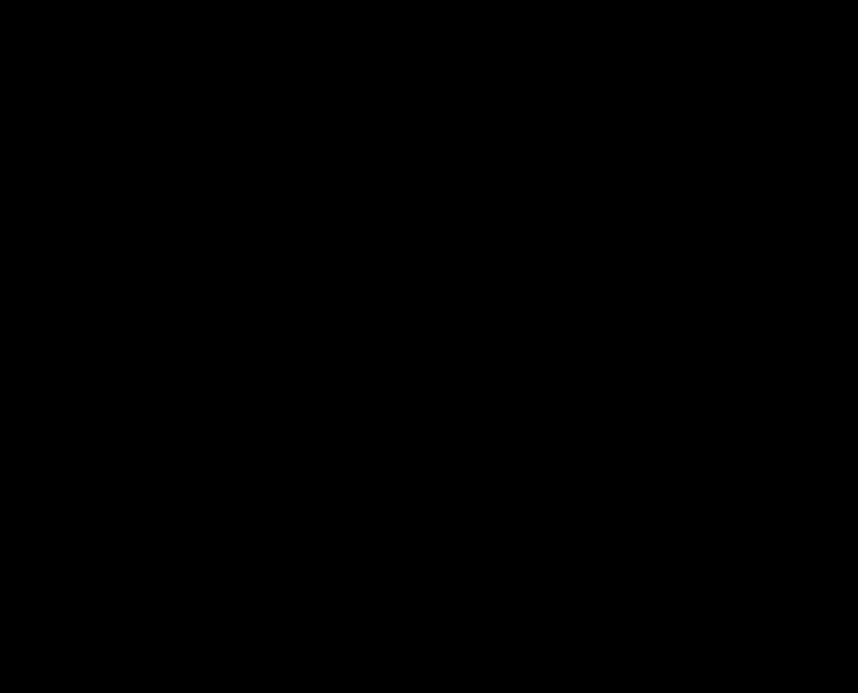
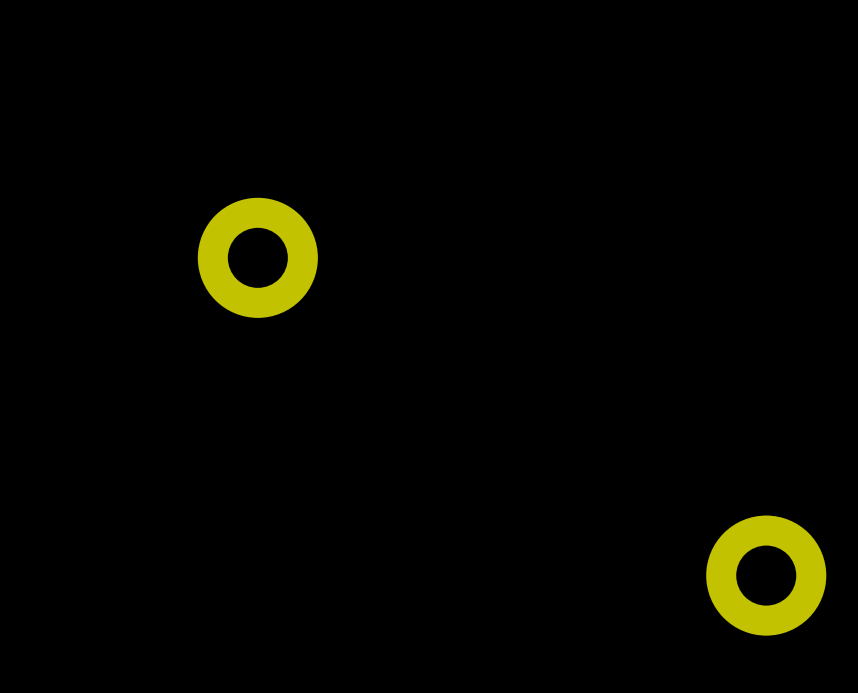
part: none -> (257, 257)
part: none -> (766, 575)

